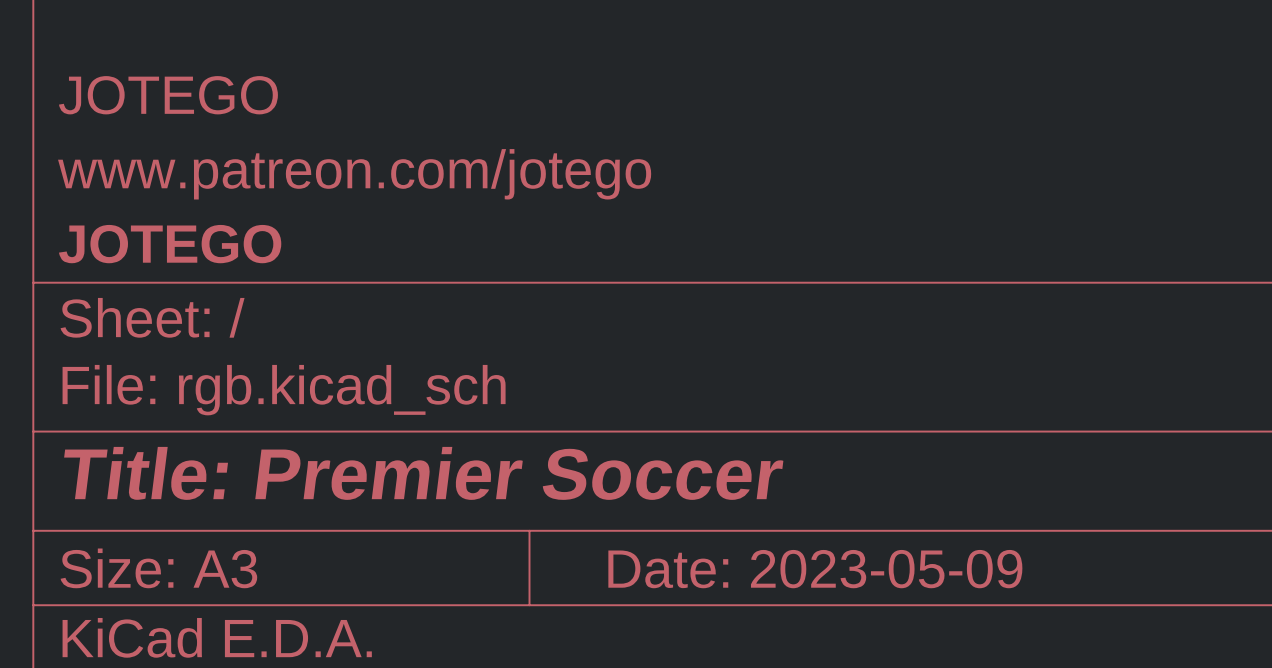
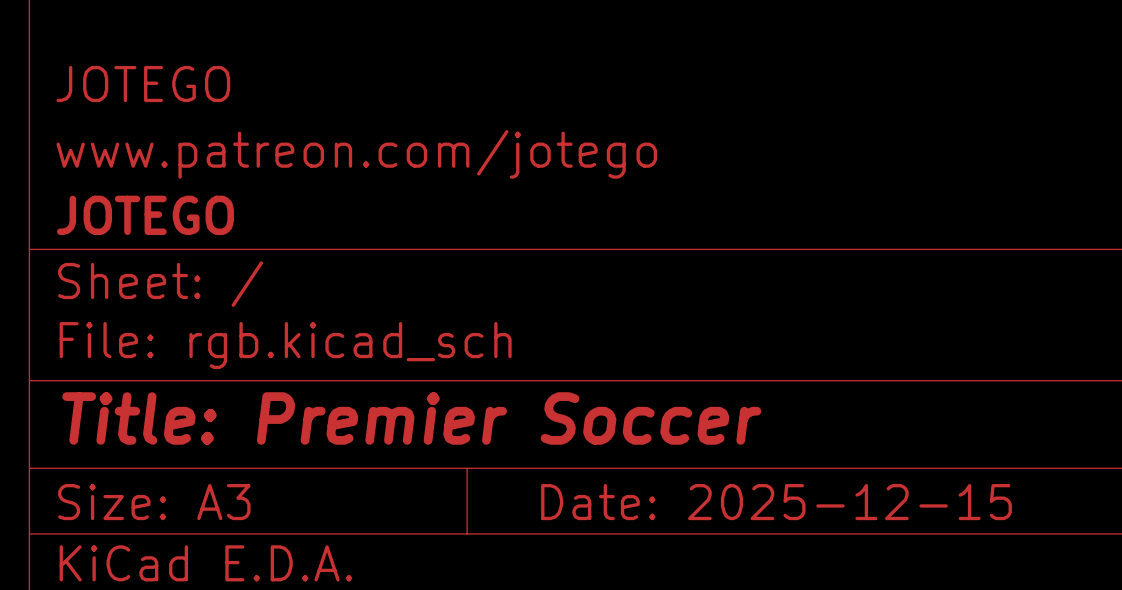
title block: Date: 2023-05-09 (815, 569) -> Date: 2025-12-15 (776, 502)

